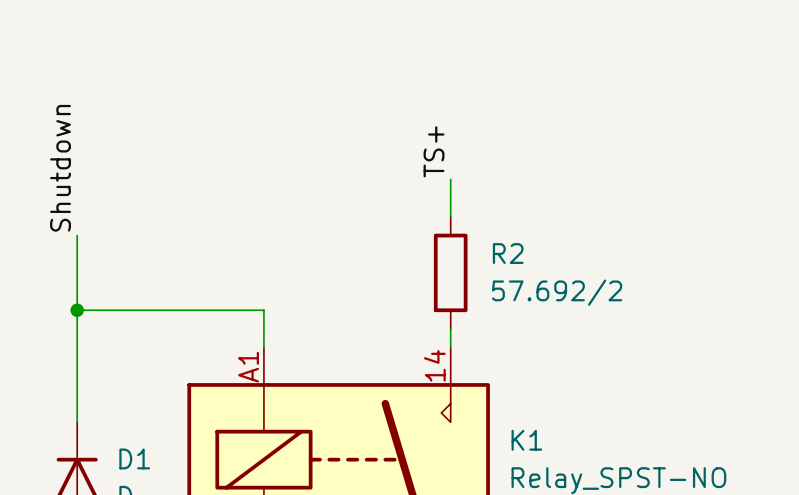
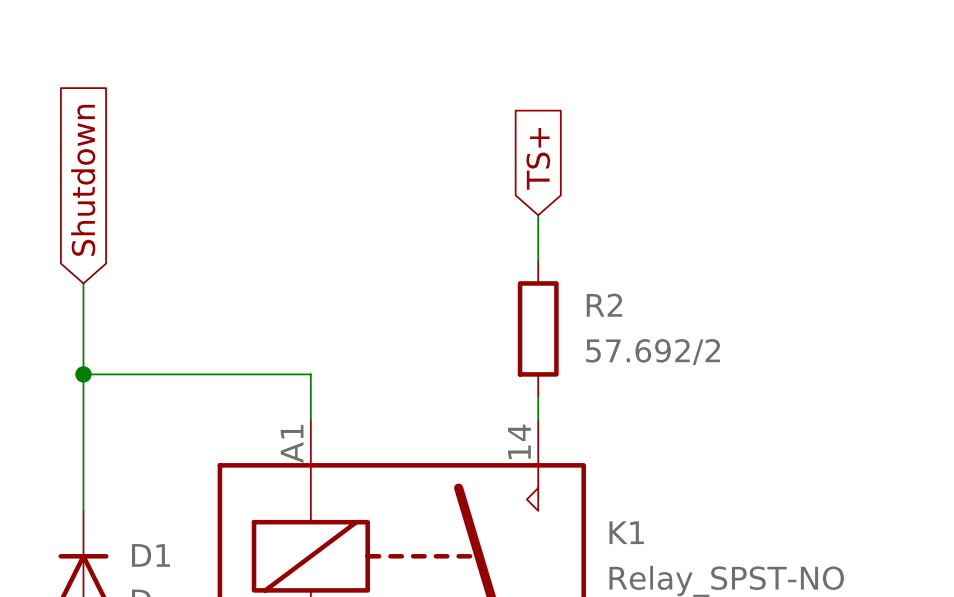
global label: none -> TS+ (538, 158)
global label: none -> Shutdown (83, 180)
label: TS+ (434, 151) -> none
label: Shutdown (60, 168) -> none

